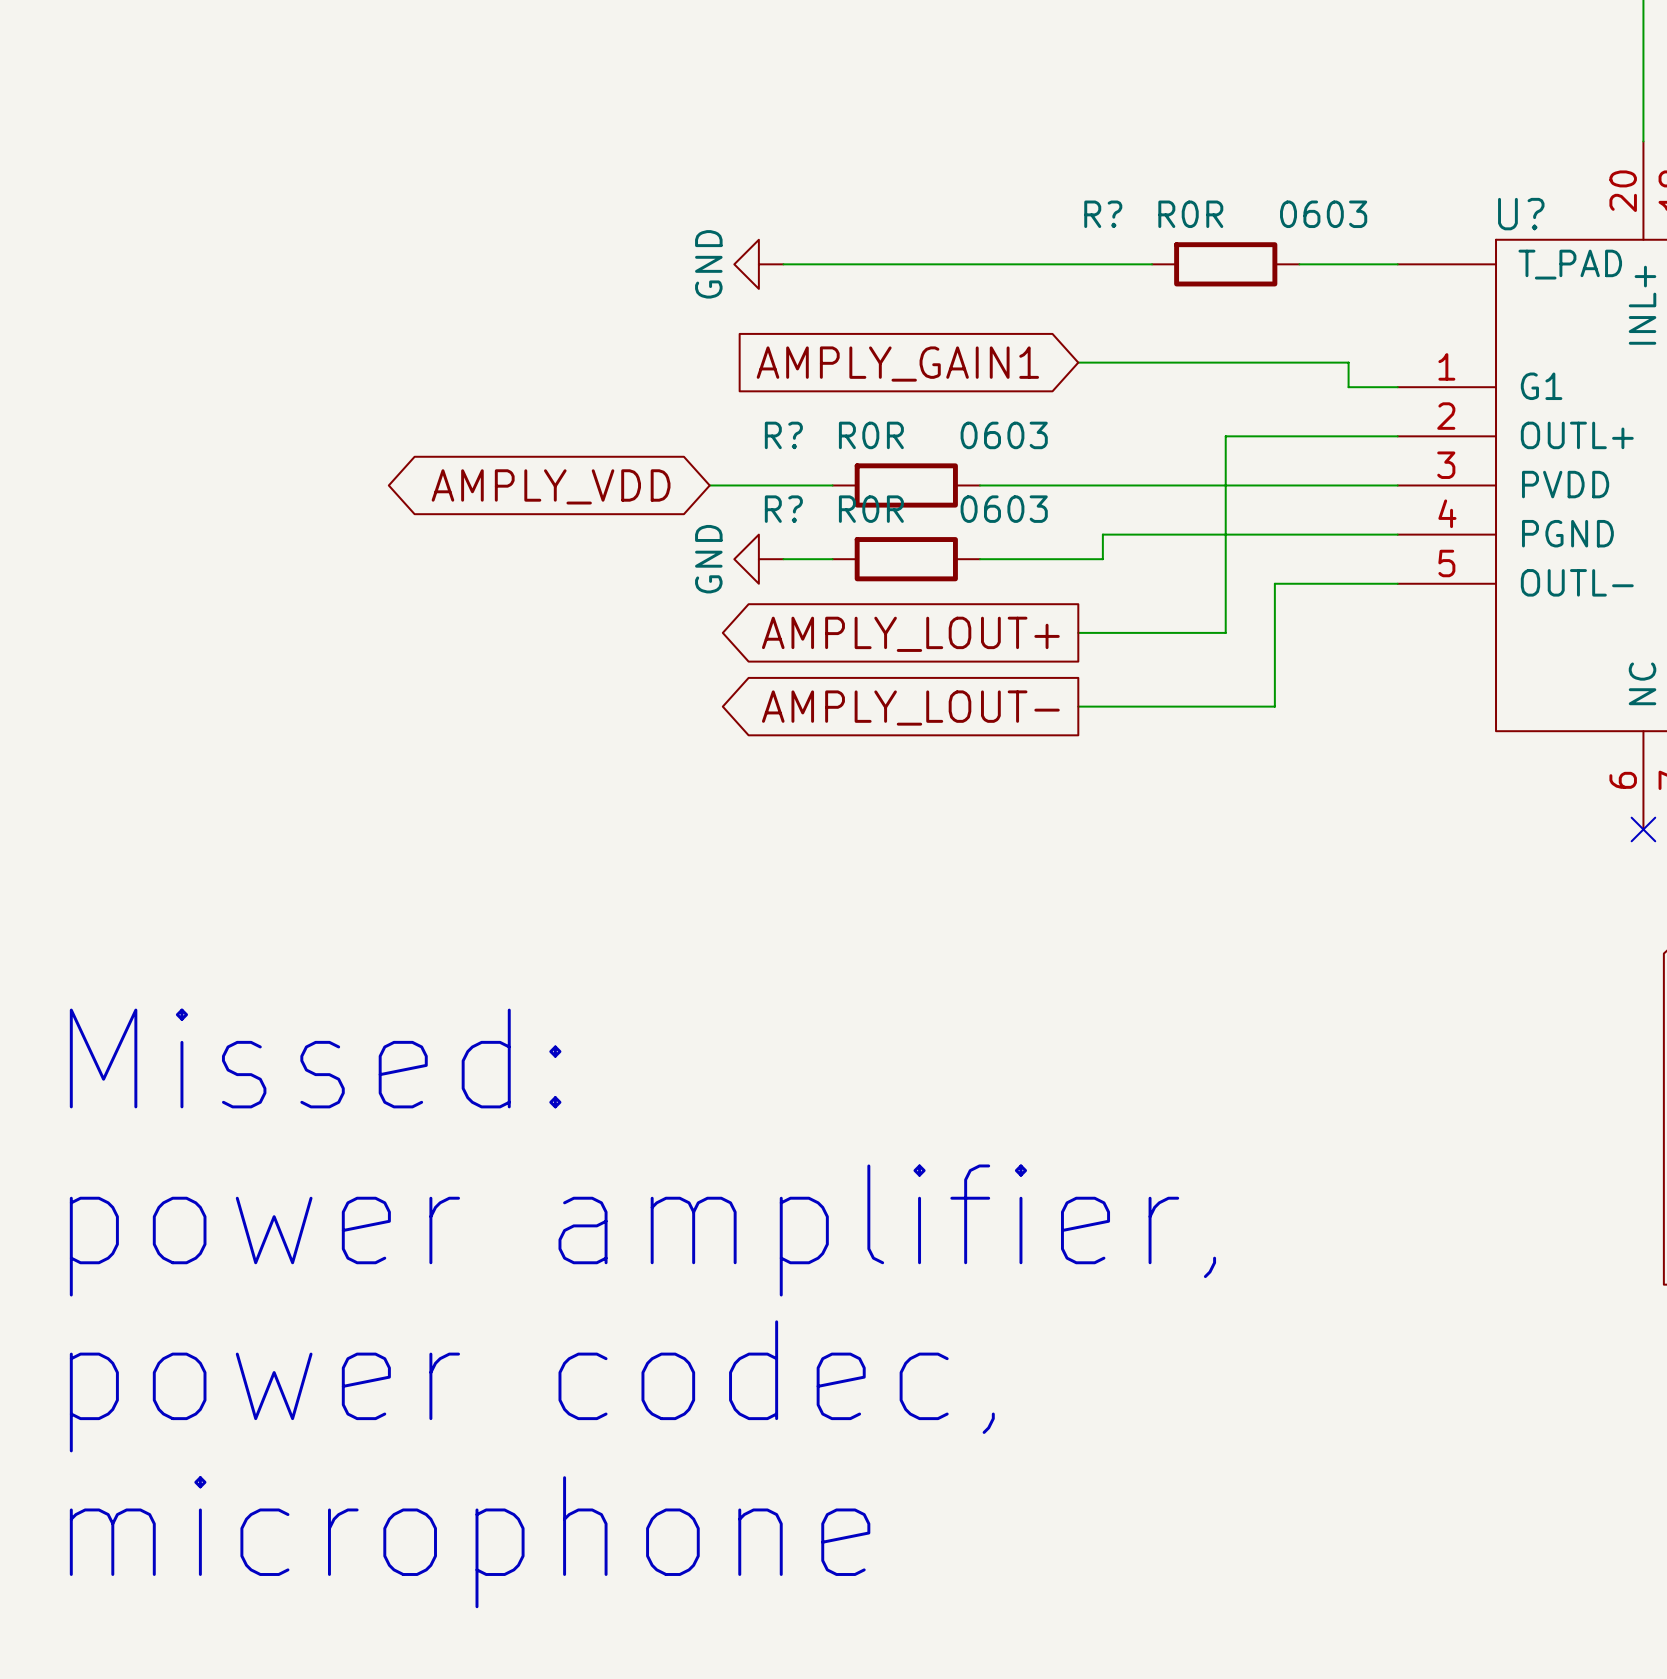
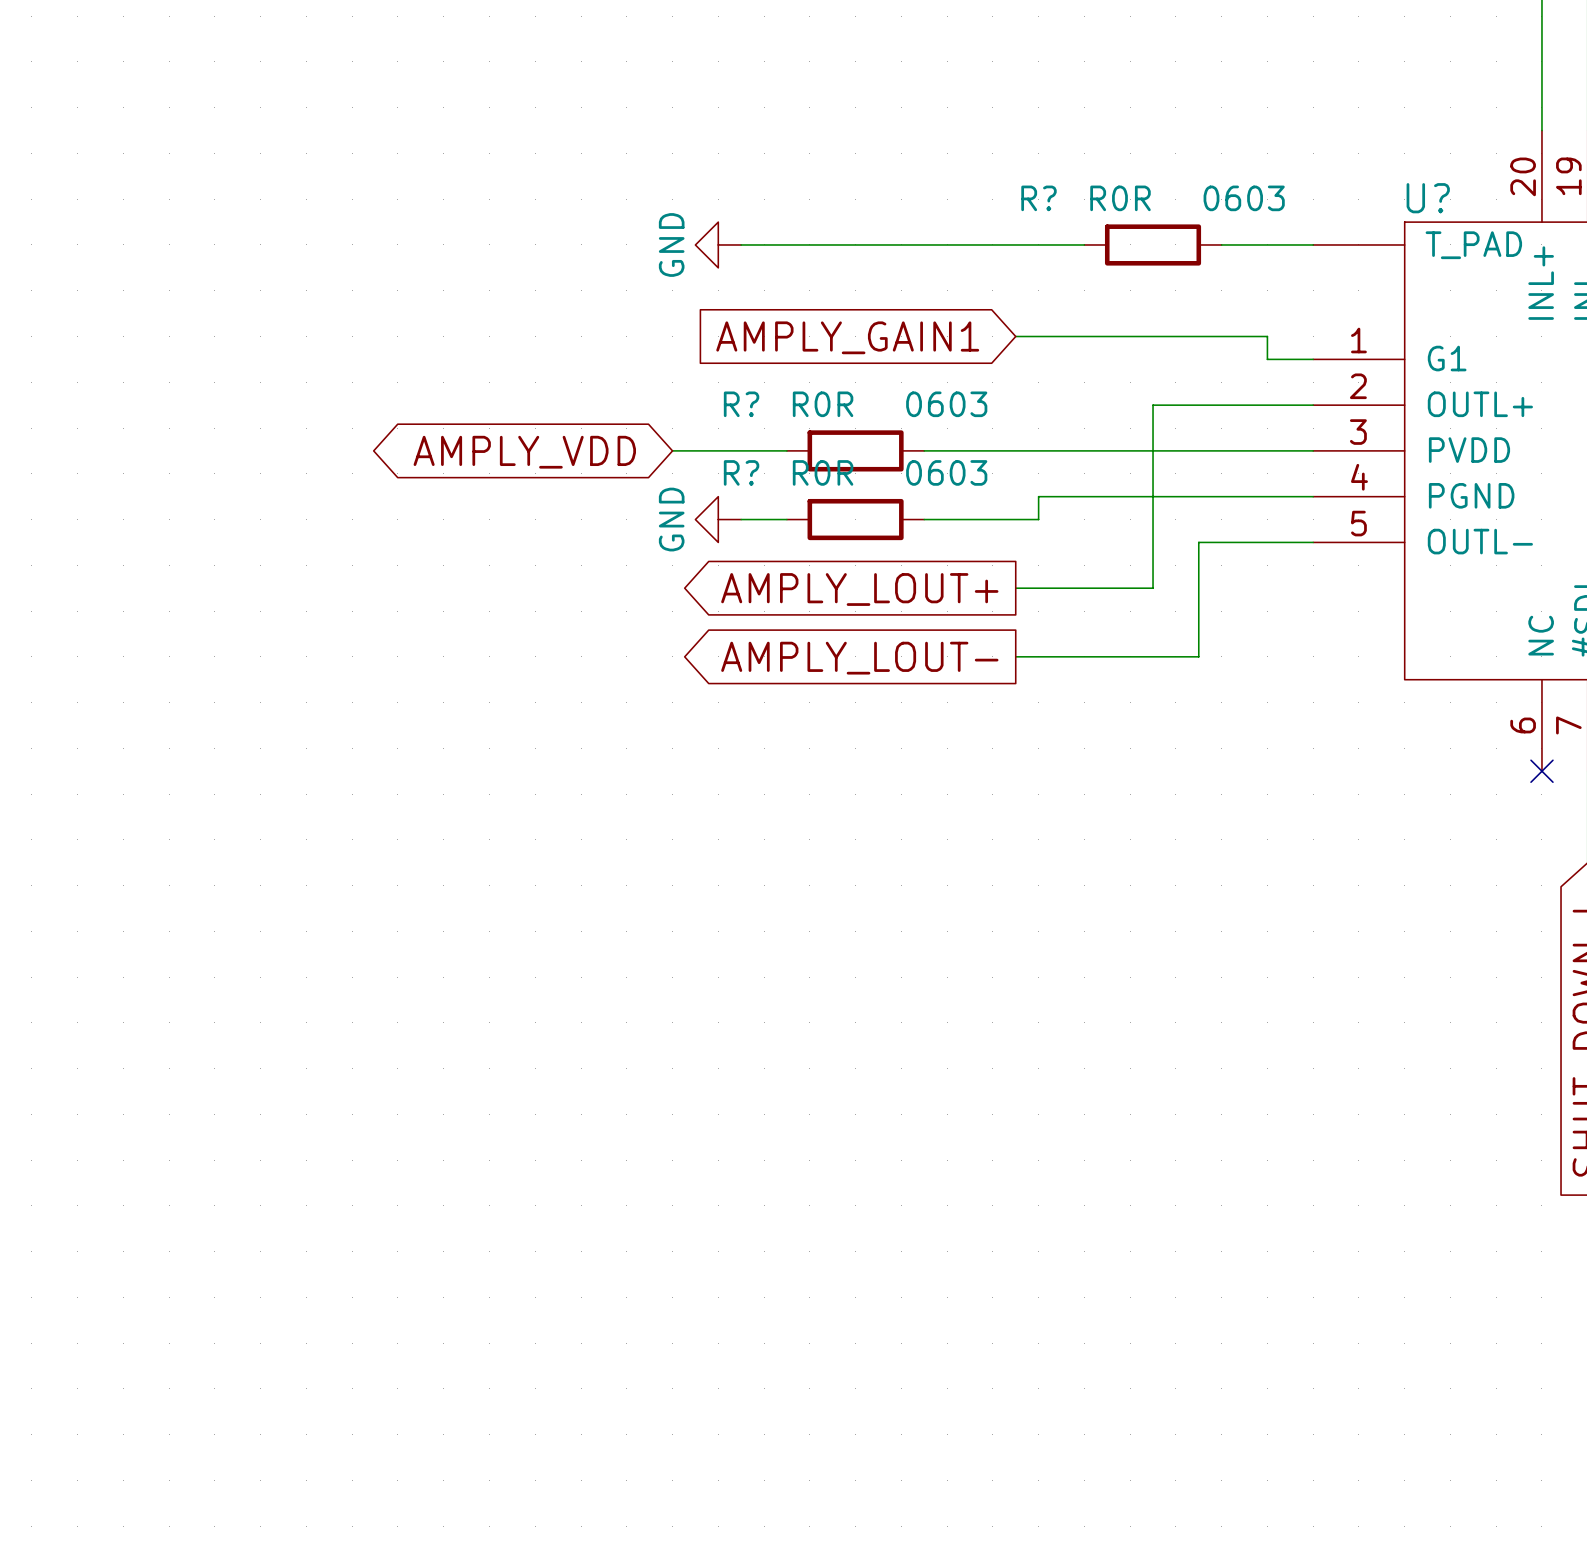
text: Missed: (315, 1058) -> none
text: power amplifier, (642, 1230) -> none
text: power codec, (532, 1386) -> none
text: microphone (470, 1542) -> none

